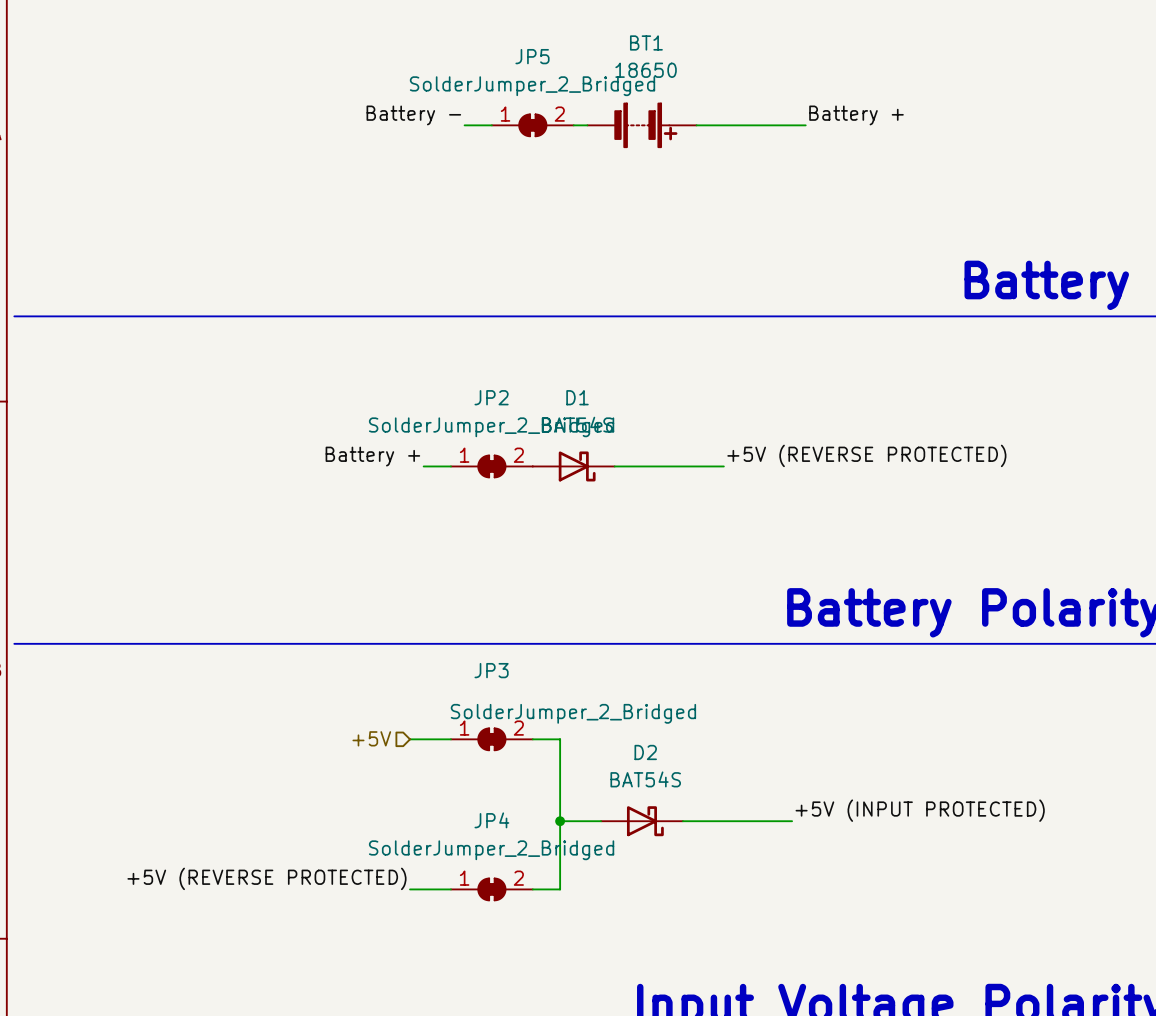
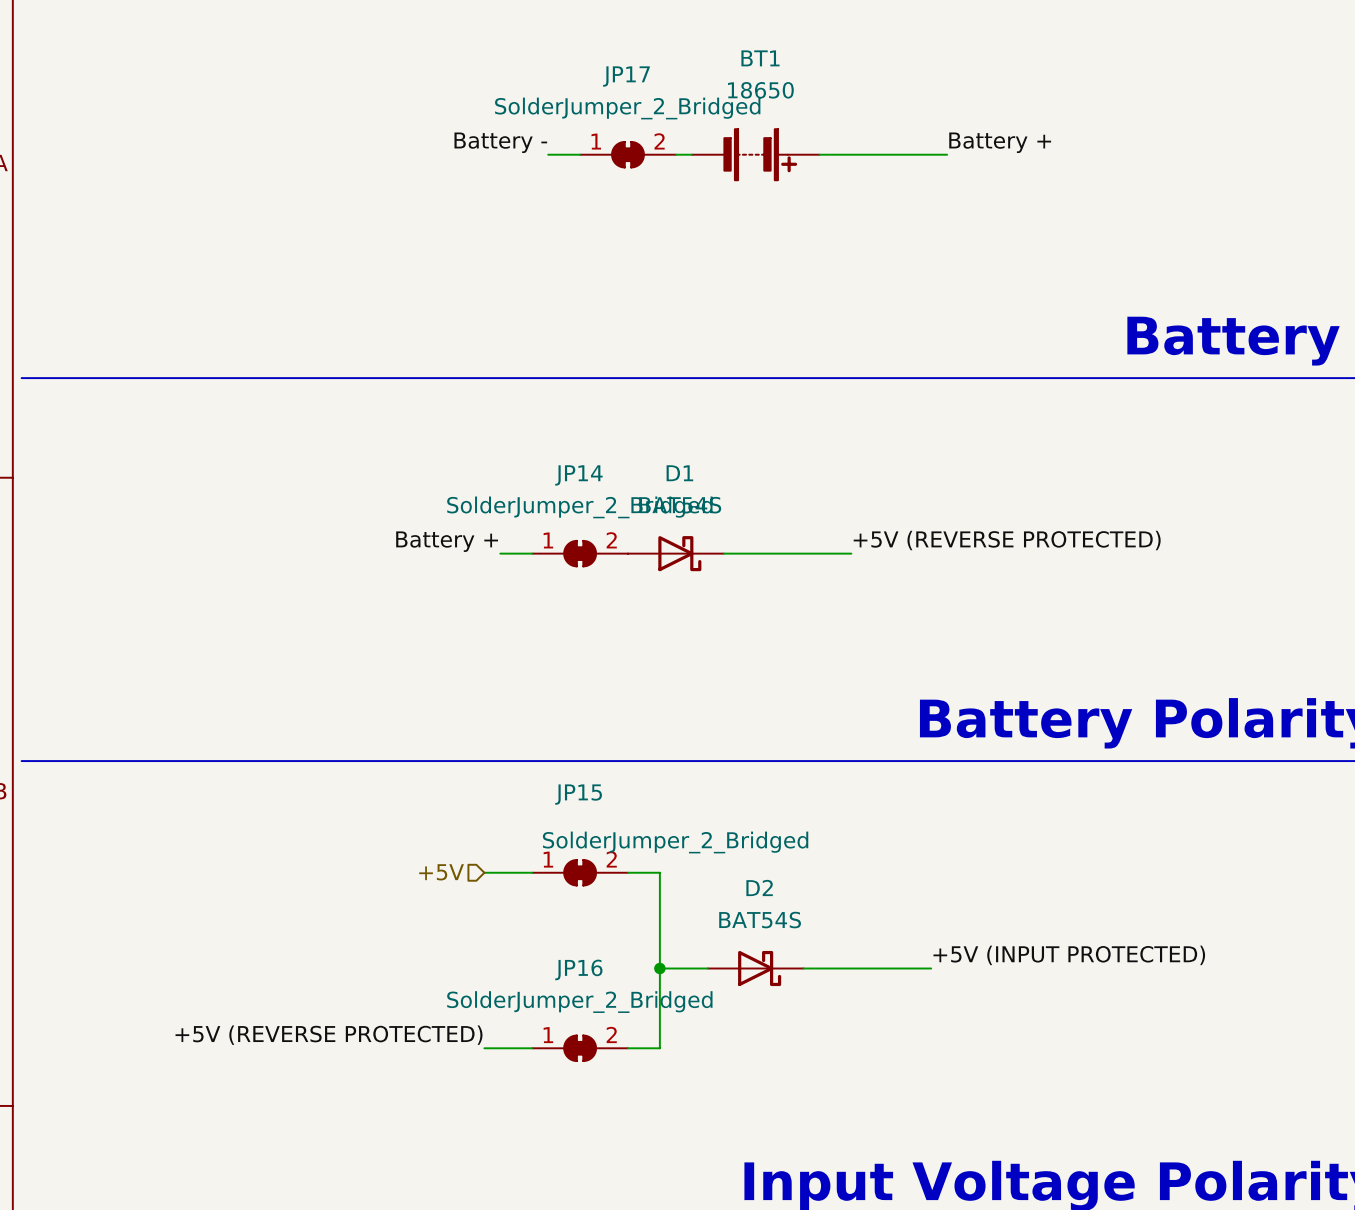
JP5 name: JP5 (532, 56) -> JP17 (626, 76)
JP2 name: JP2 (491, 397) -> JP14 (578, 475)
JP3 name: JP3 (491, 670) -> JP15 (578, 794)
JP4 name: JP4 (491, 820) -> JP16 (578, 969)

